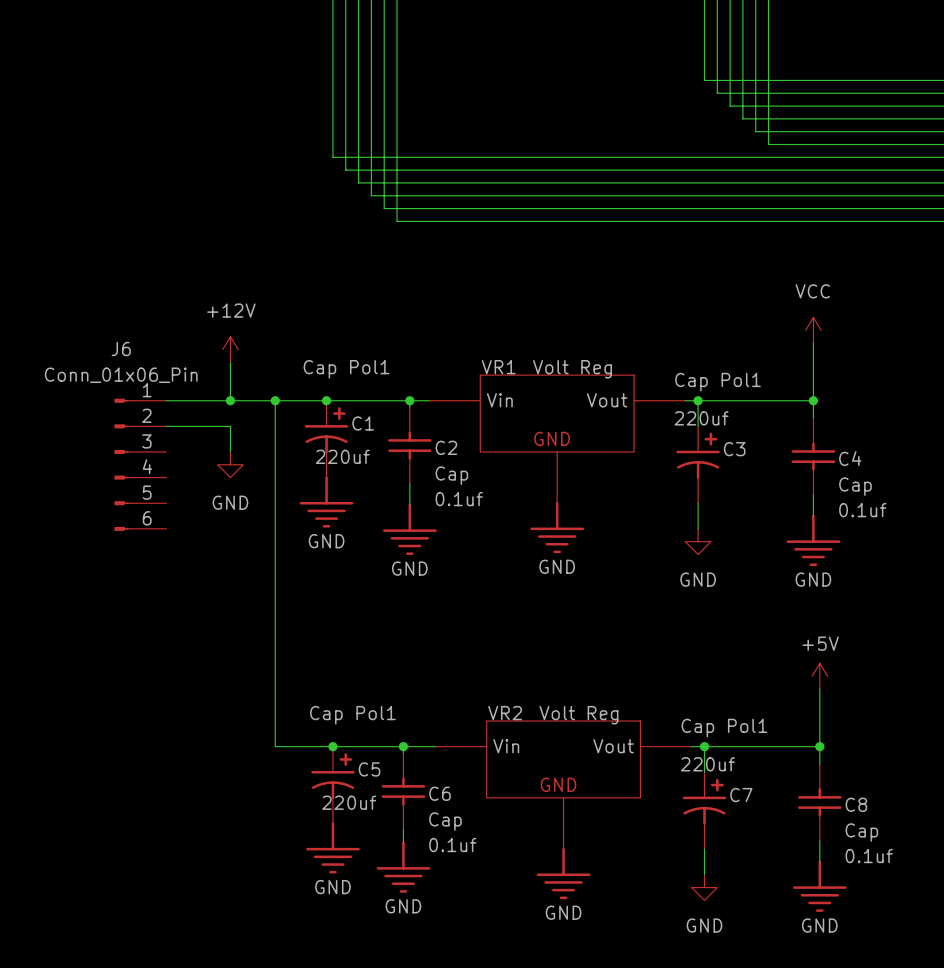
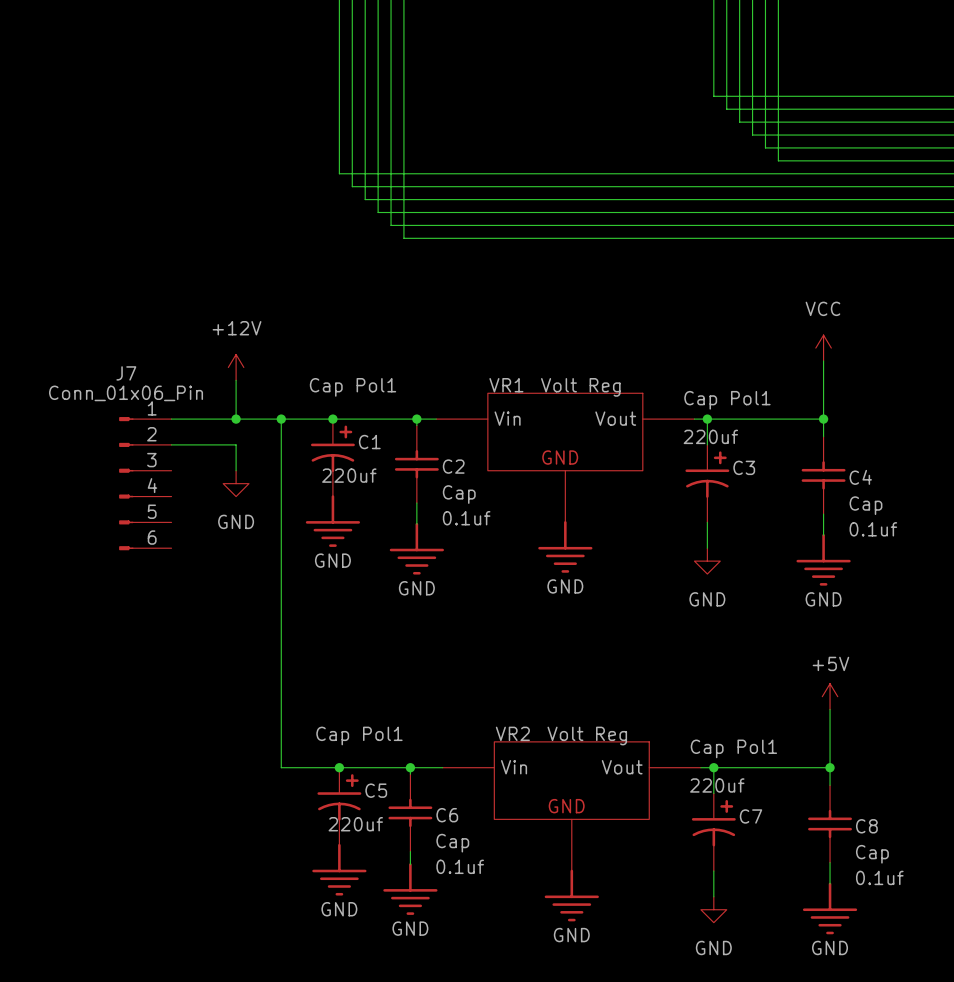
J6 name: J6 (121, 349) -> J7 (126, 373)

